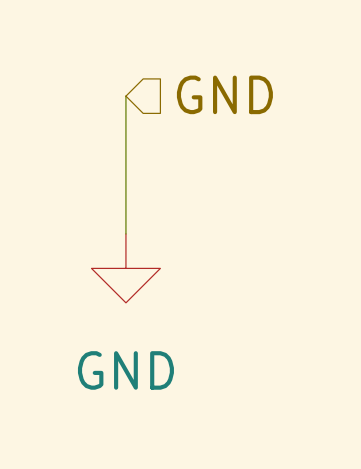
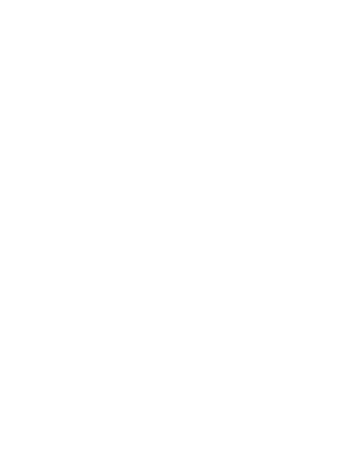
hierarchical label: GND (224, 94) -> none
wire: (125, 96) (125, 233) -> none
power symbol: GND (125, 268) -> none

